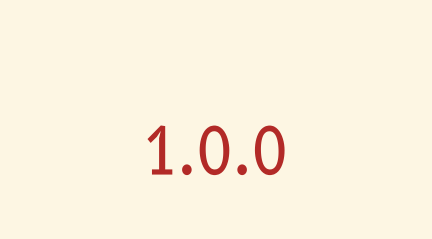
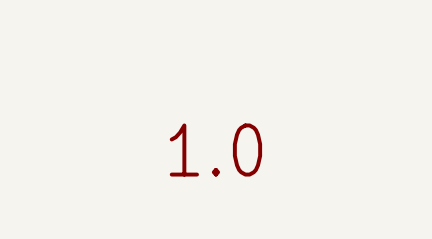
text: 1.0.0 (216, 150) -> 1.0 (215, 150)

